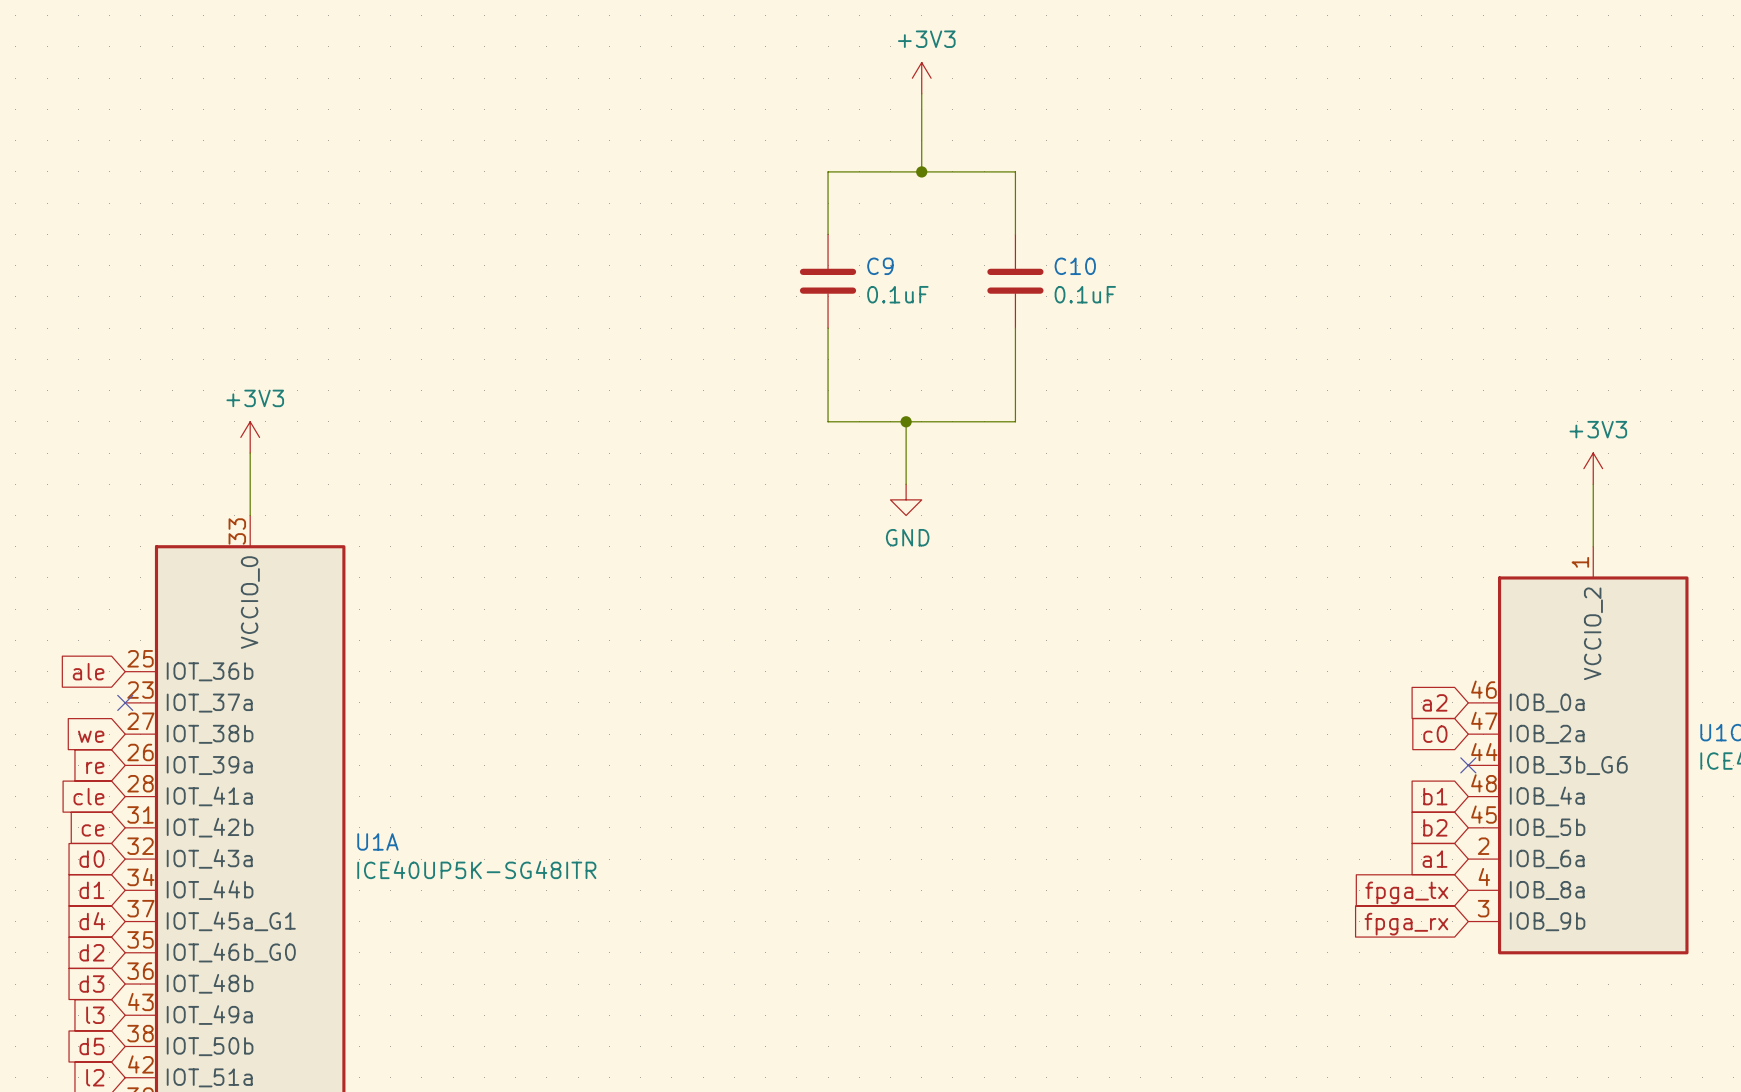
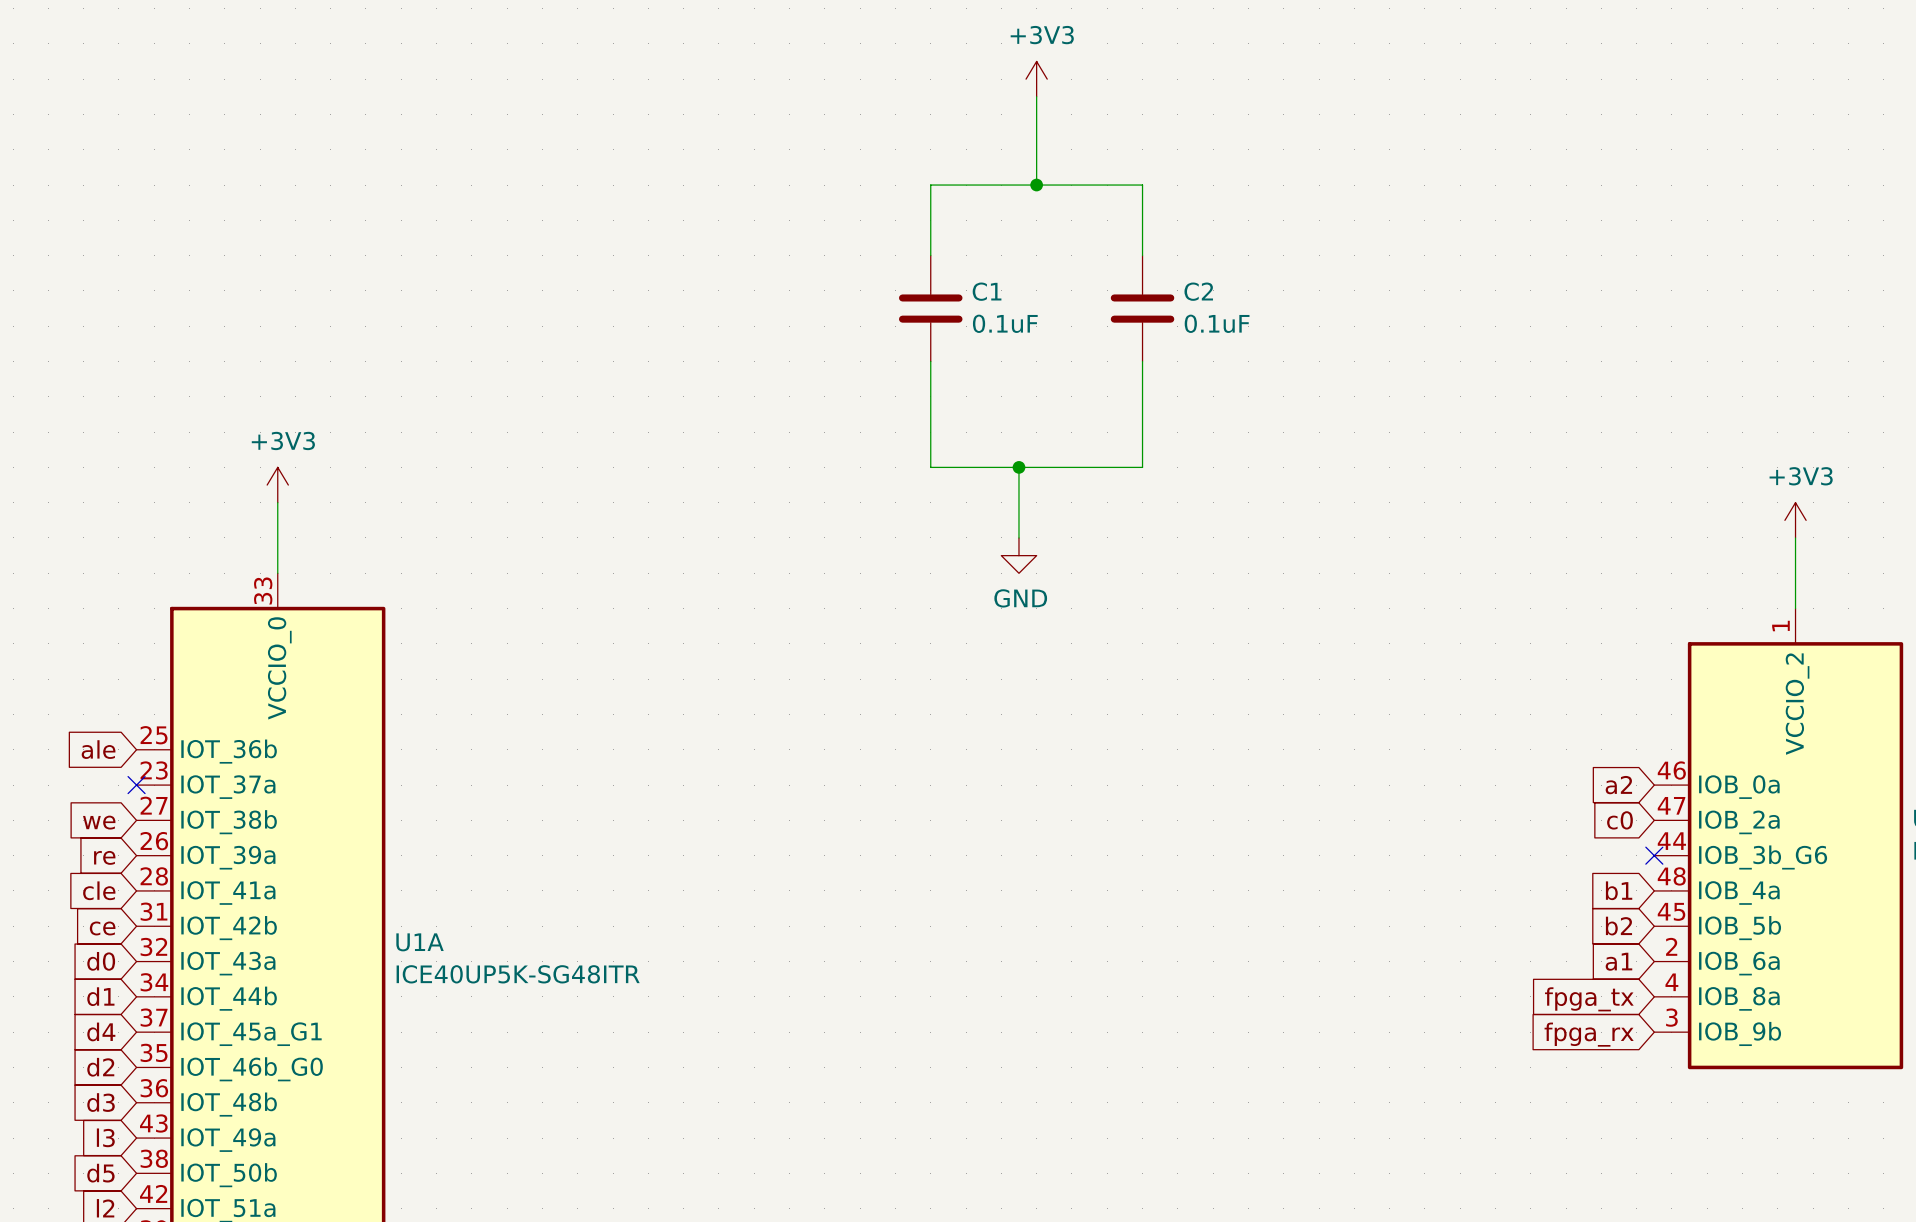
C9 name: C9 (880, 266) -> C1 (987, 291)
C10 name: C10 (1075, 266) -> C2 (1198, 291)

